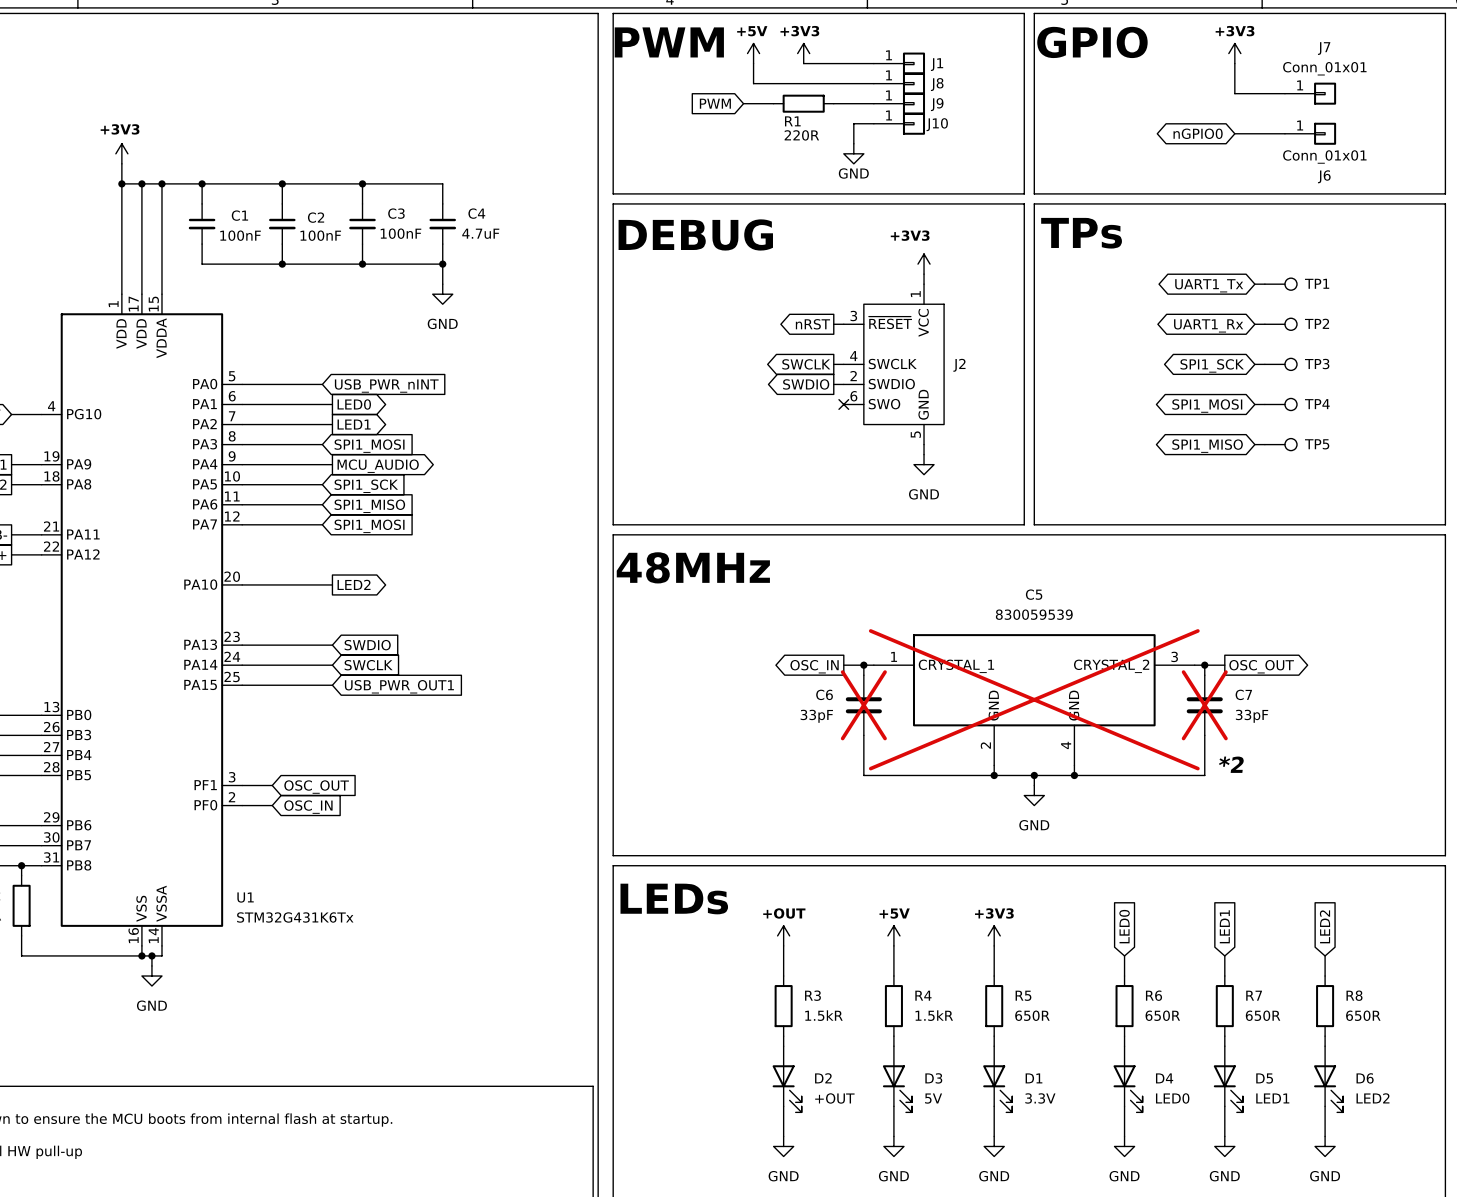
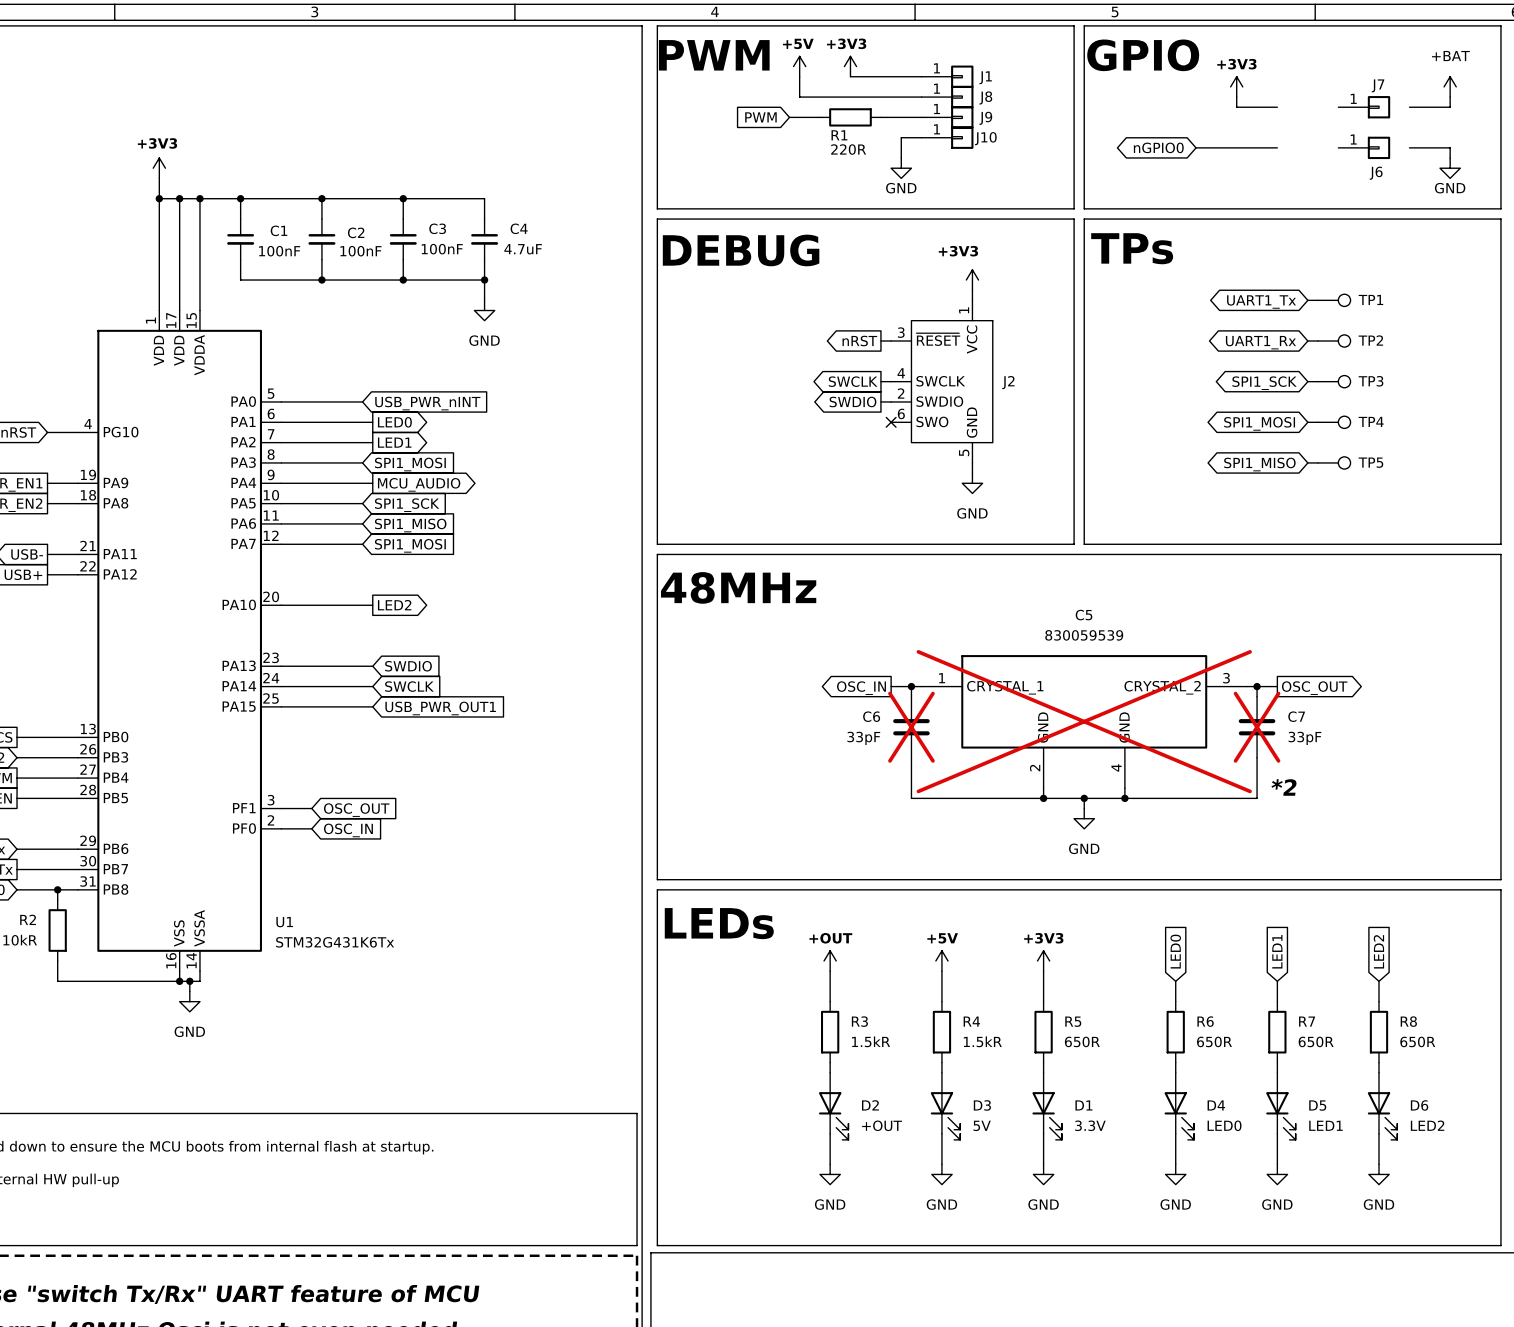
J7 name position: J7 (1324, 48) -> J7 (1378, 85)
power symbol position: +3V3 (1234, 53) -> +3V3 (1236, 86)
wire: (1234, 63) (1234, 93) (1284, 93) -> none
J7 value: Conn_01x01 (1324, 68) -> none
power symbol: none -> +BAT (1450, 86)
wire: none -> (1236, 97) (1236, 107) (1277, 107)
wire: none -> (1450, 97) (1450, 107) (1409, 107)
wire: none -> (1196, 147) (1277, 147)
global label position: nGPIO0 (1198, 133) -> nGPIO0 (1158, 147)
wire: (1234, 133) (1284, 133) -> none
wire: none -> (1409, 147) (1450, 147) (1450, 158)
power symbol: none -> GND (1450, 168)
J6 value: Conn_01x01 (1324, 156) -> none
J6 name position: J6 (1324, 176) -> J6 (1376, 173)

